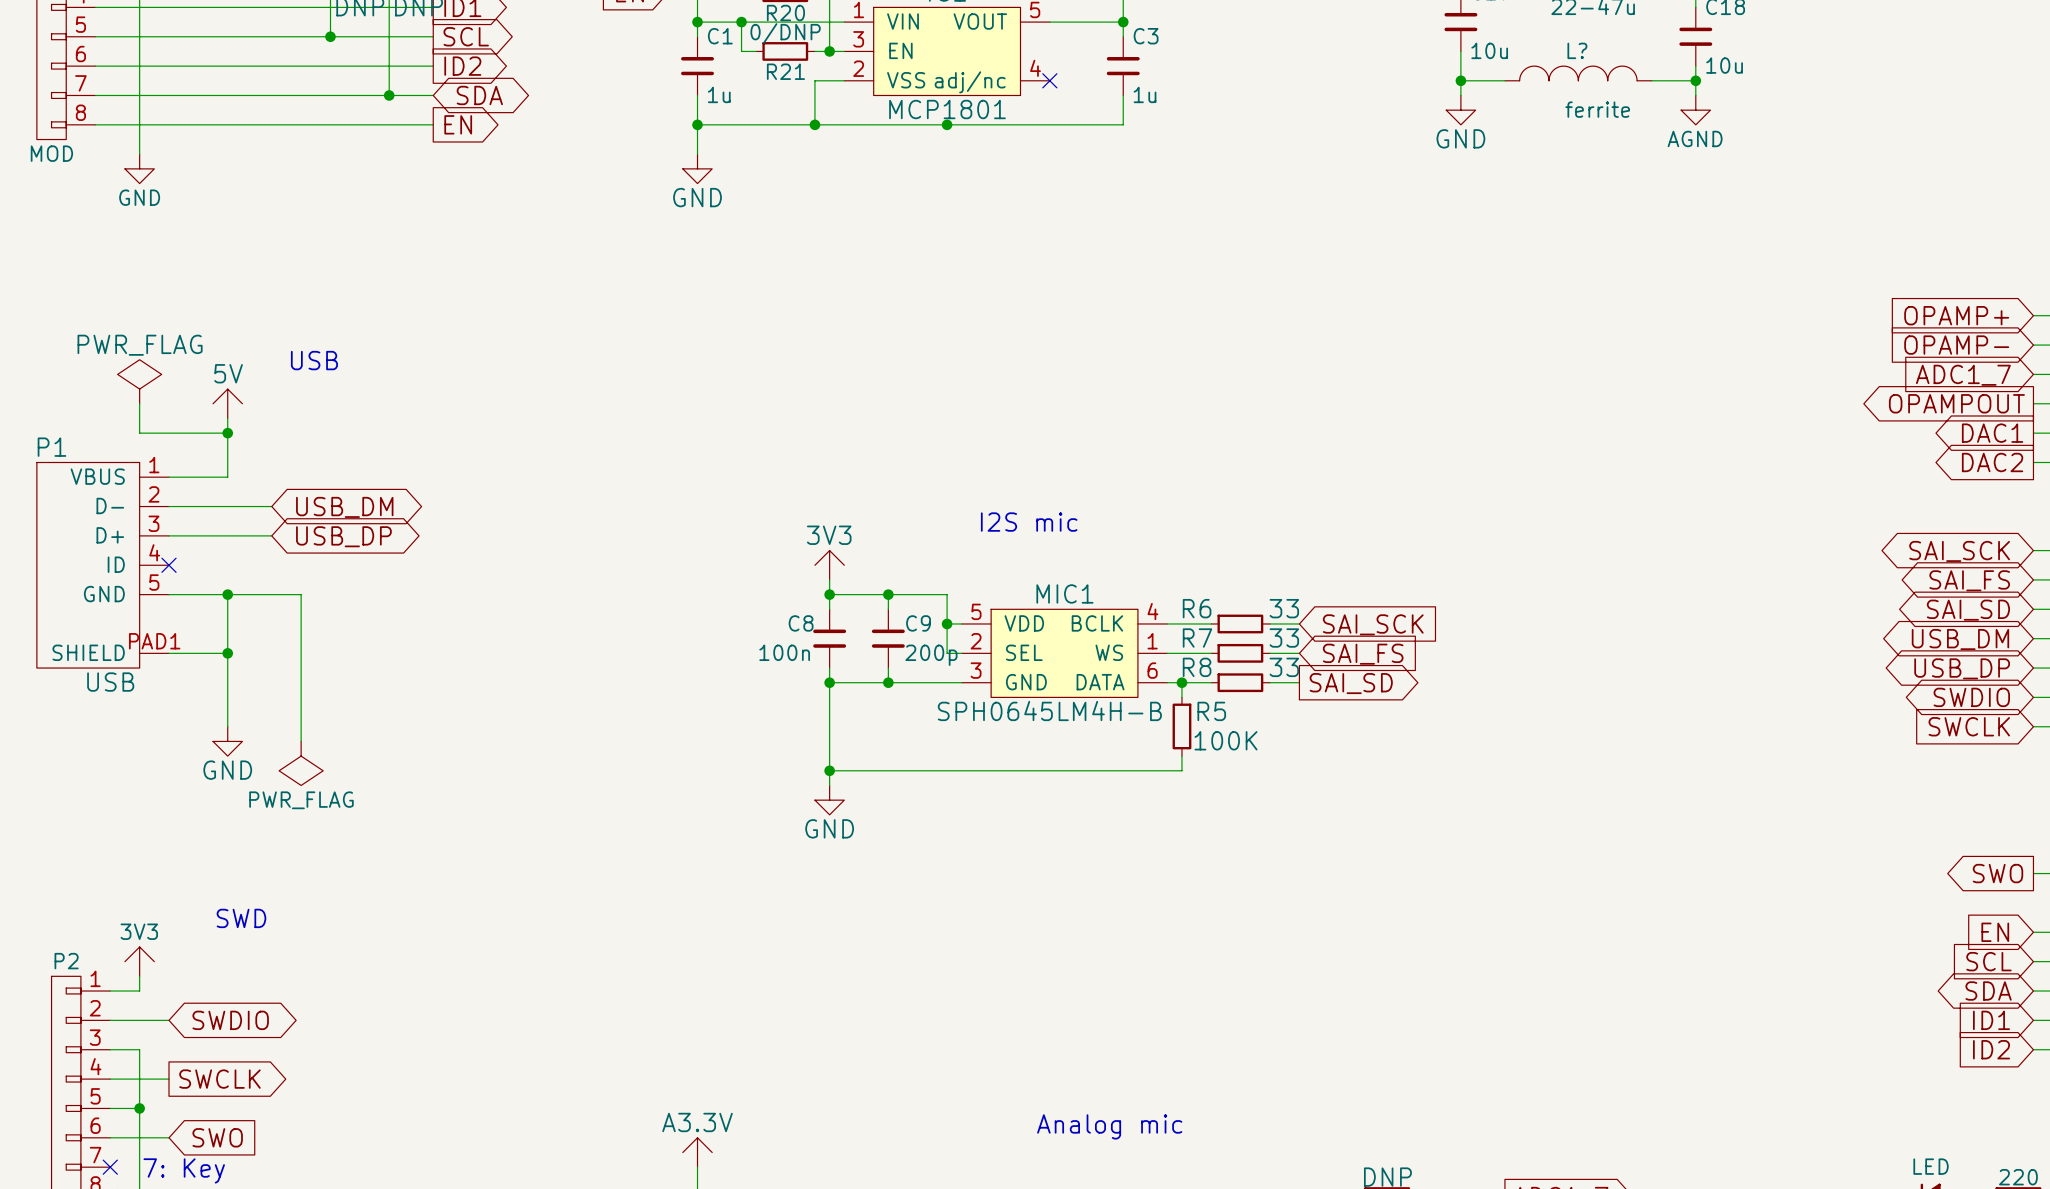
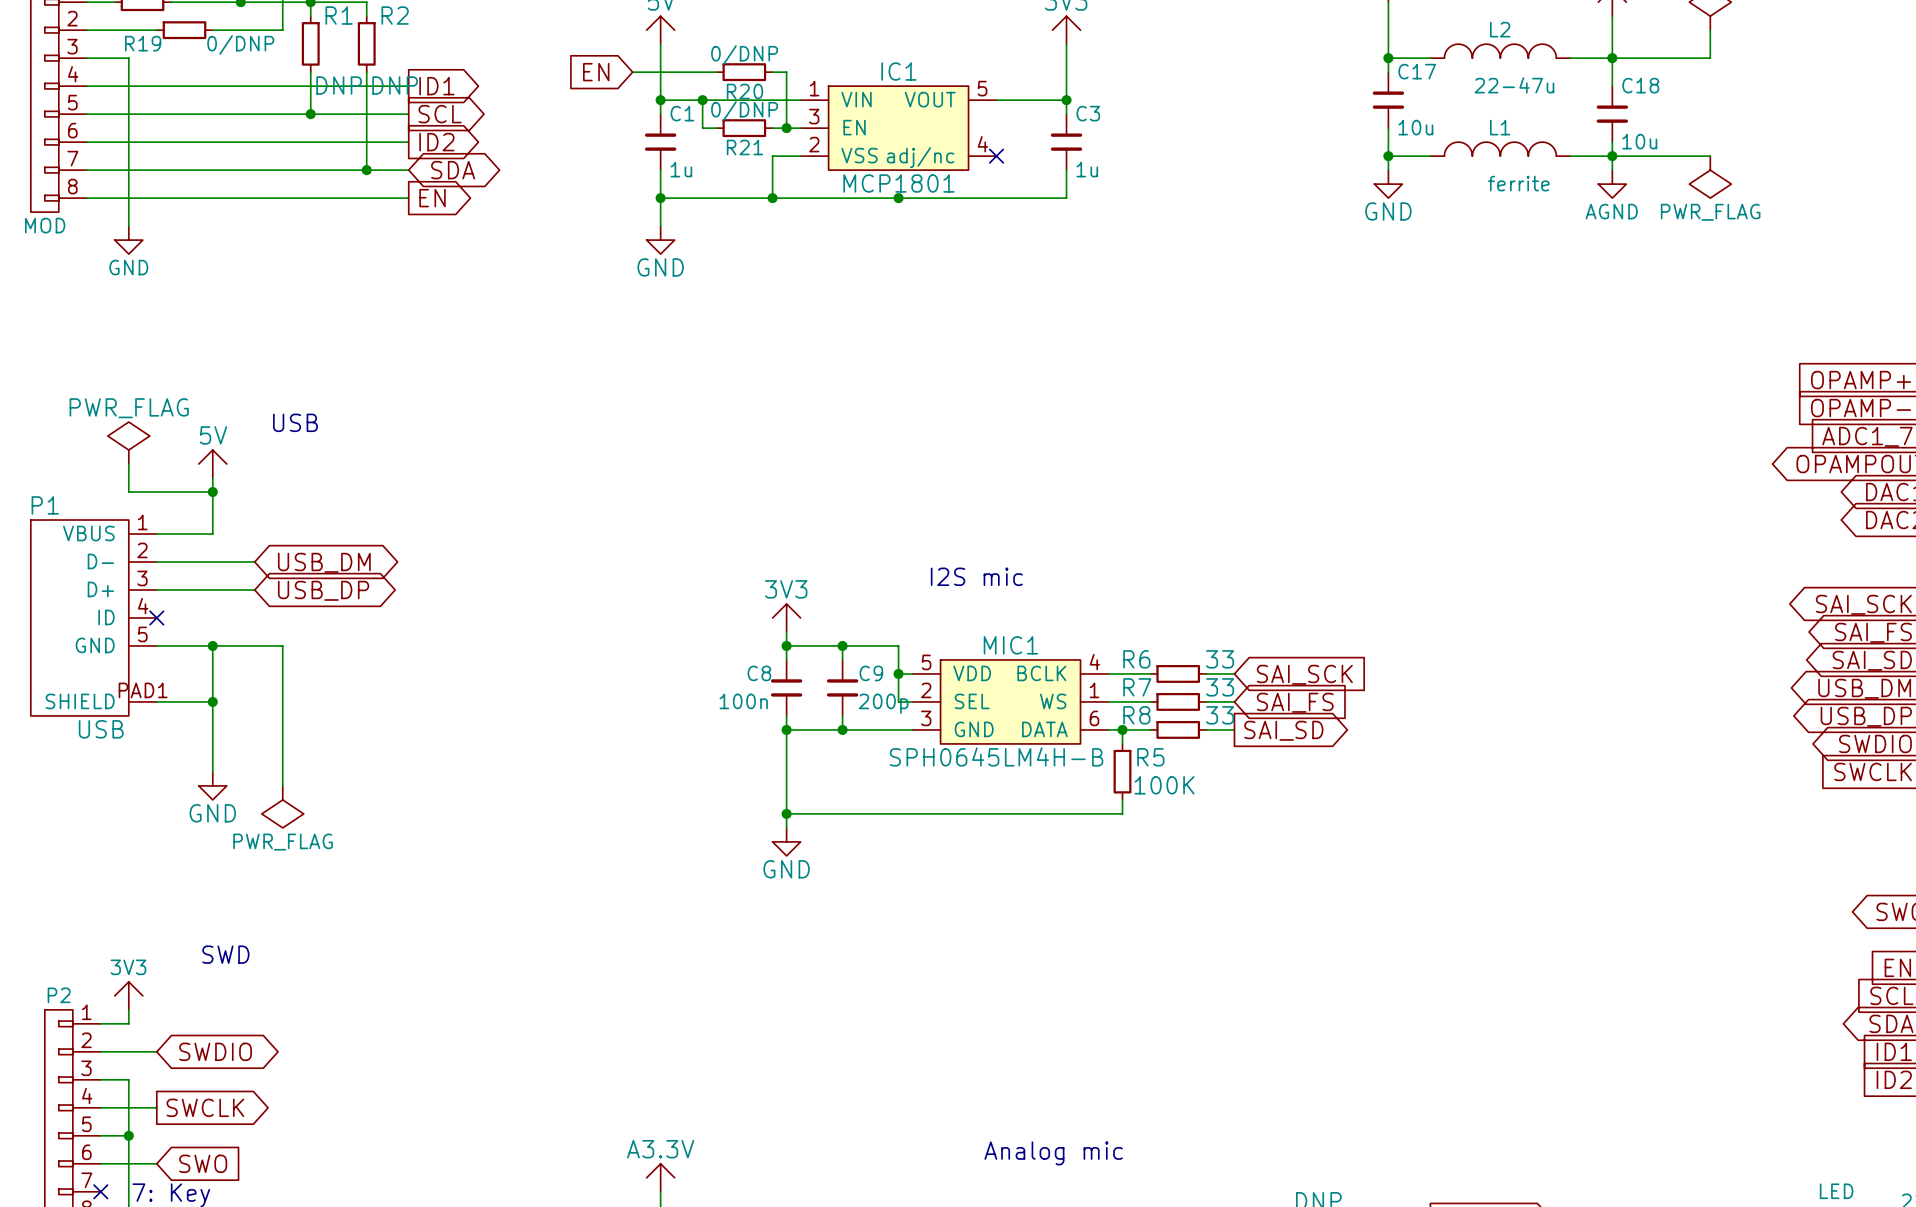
L? name: L? (1577, 50) -> L1 (1500, 127)
wire: none -> (1612, 156) (1710, 156)
power symbol: none -> PWR_FLAG (1710, 177)

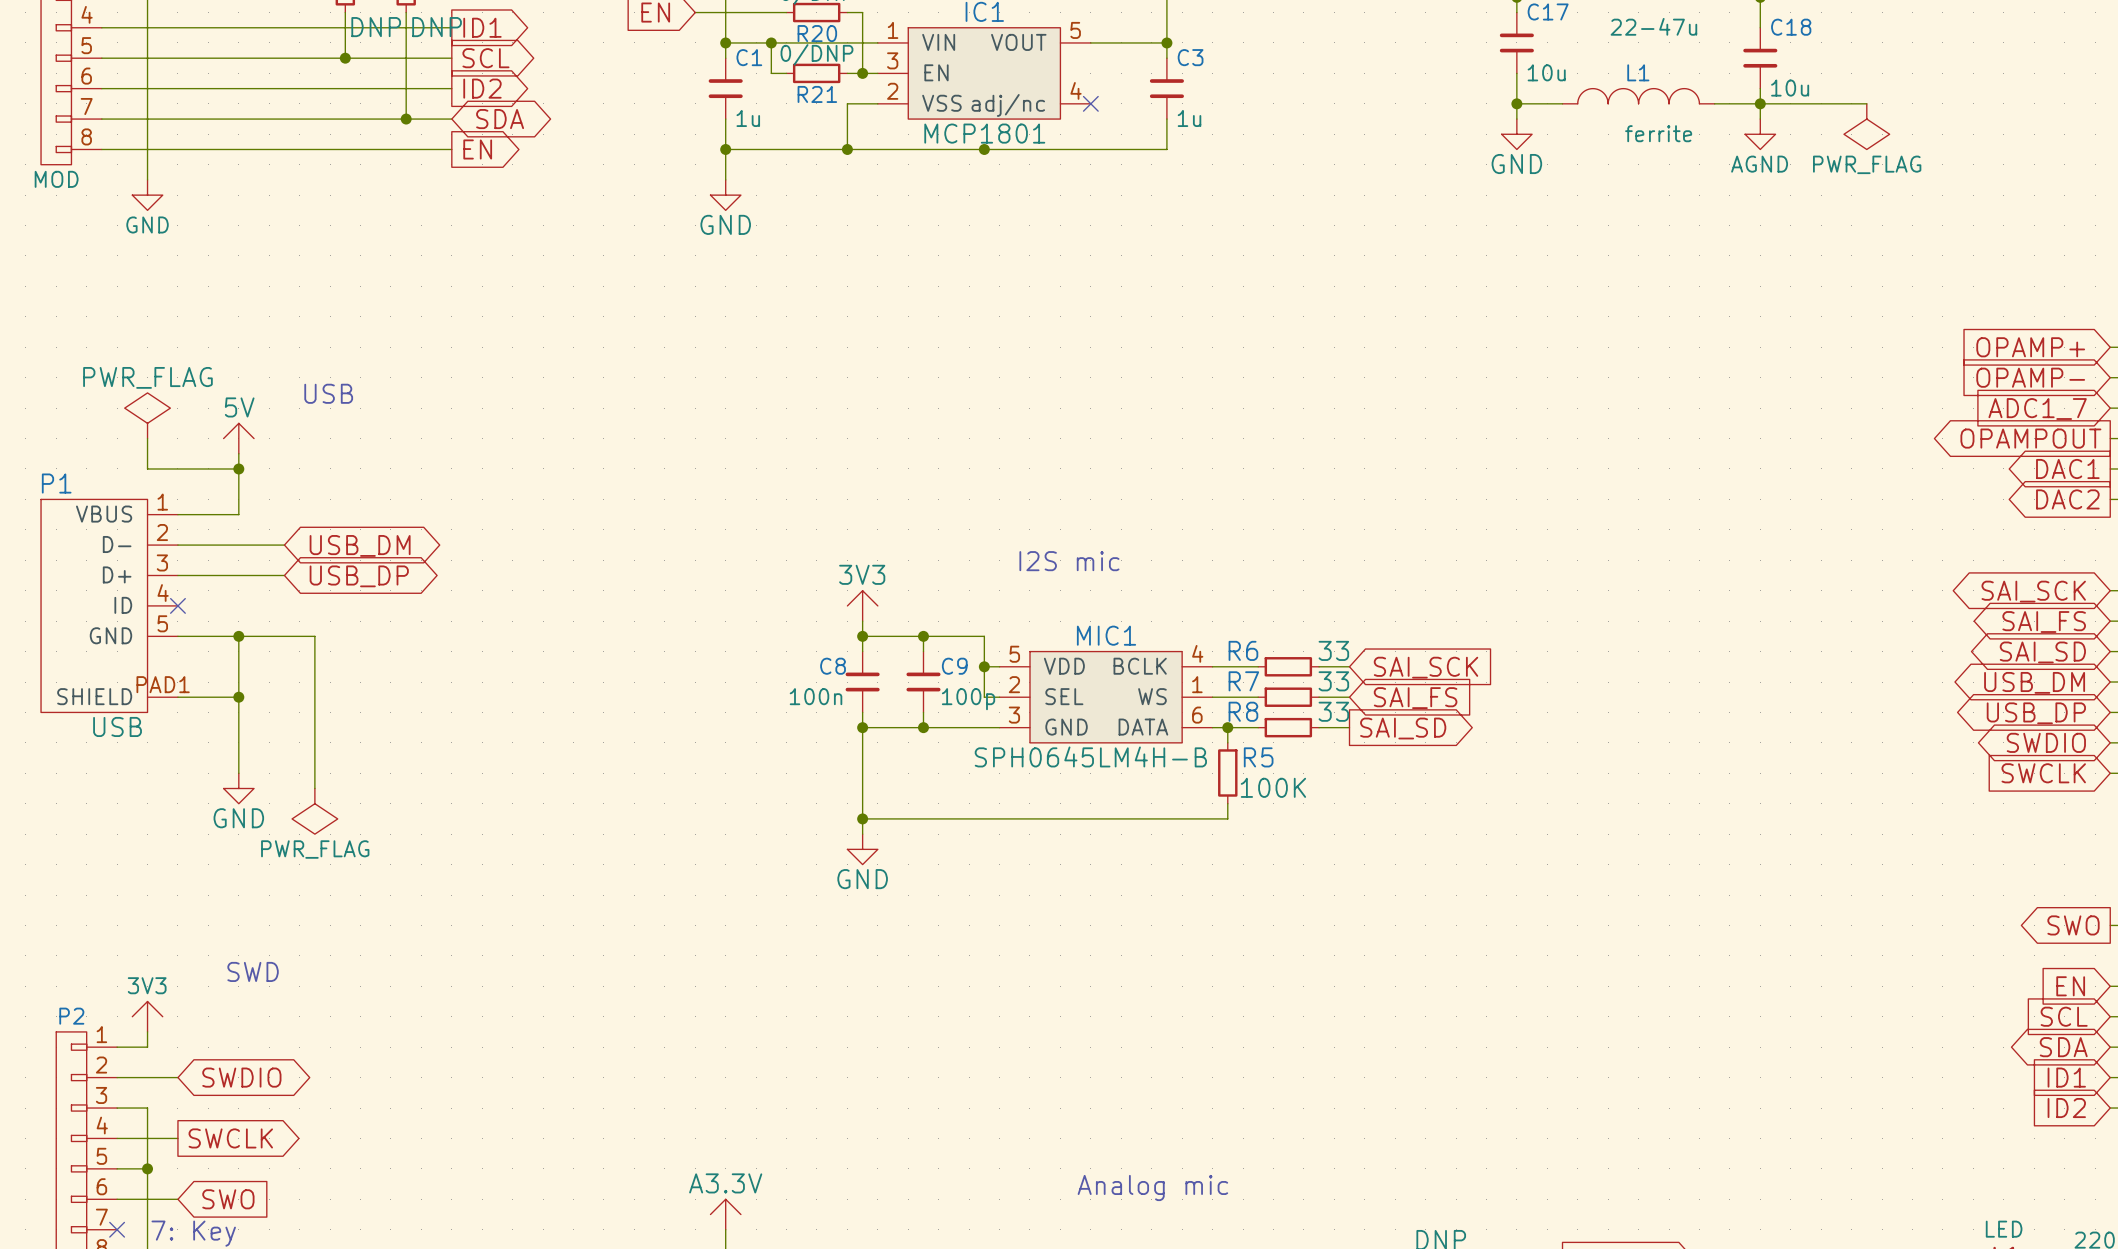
C9 value: 200p (883, 703) -> 100p (968, 699)

